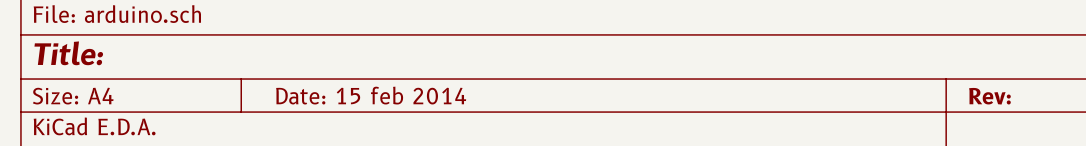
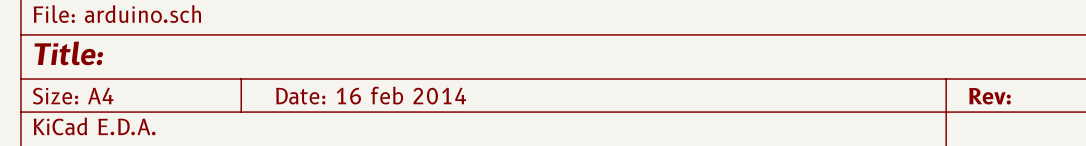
title block: Date: 15 feb 2014 (371, 95) -> Date: 16 feb 2014 (371, 95)

